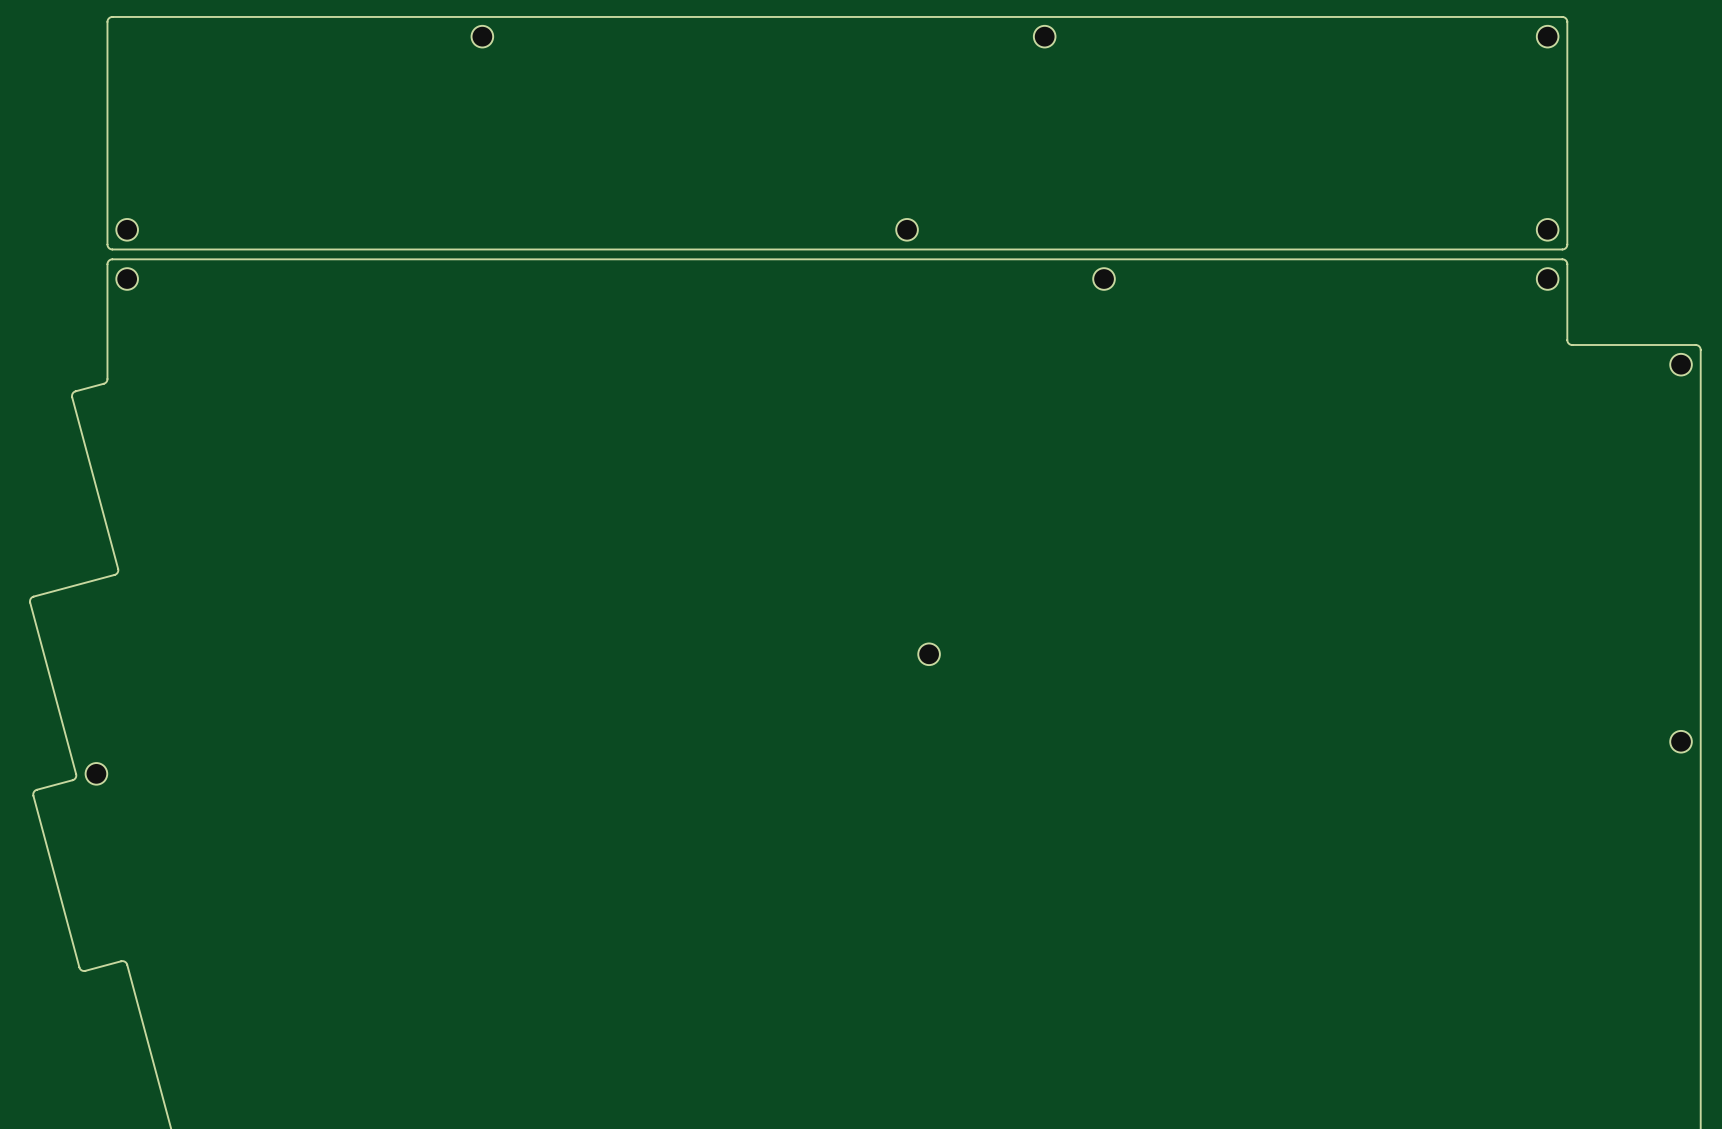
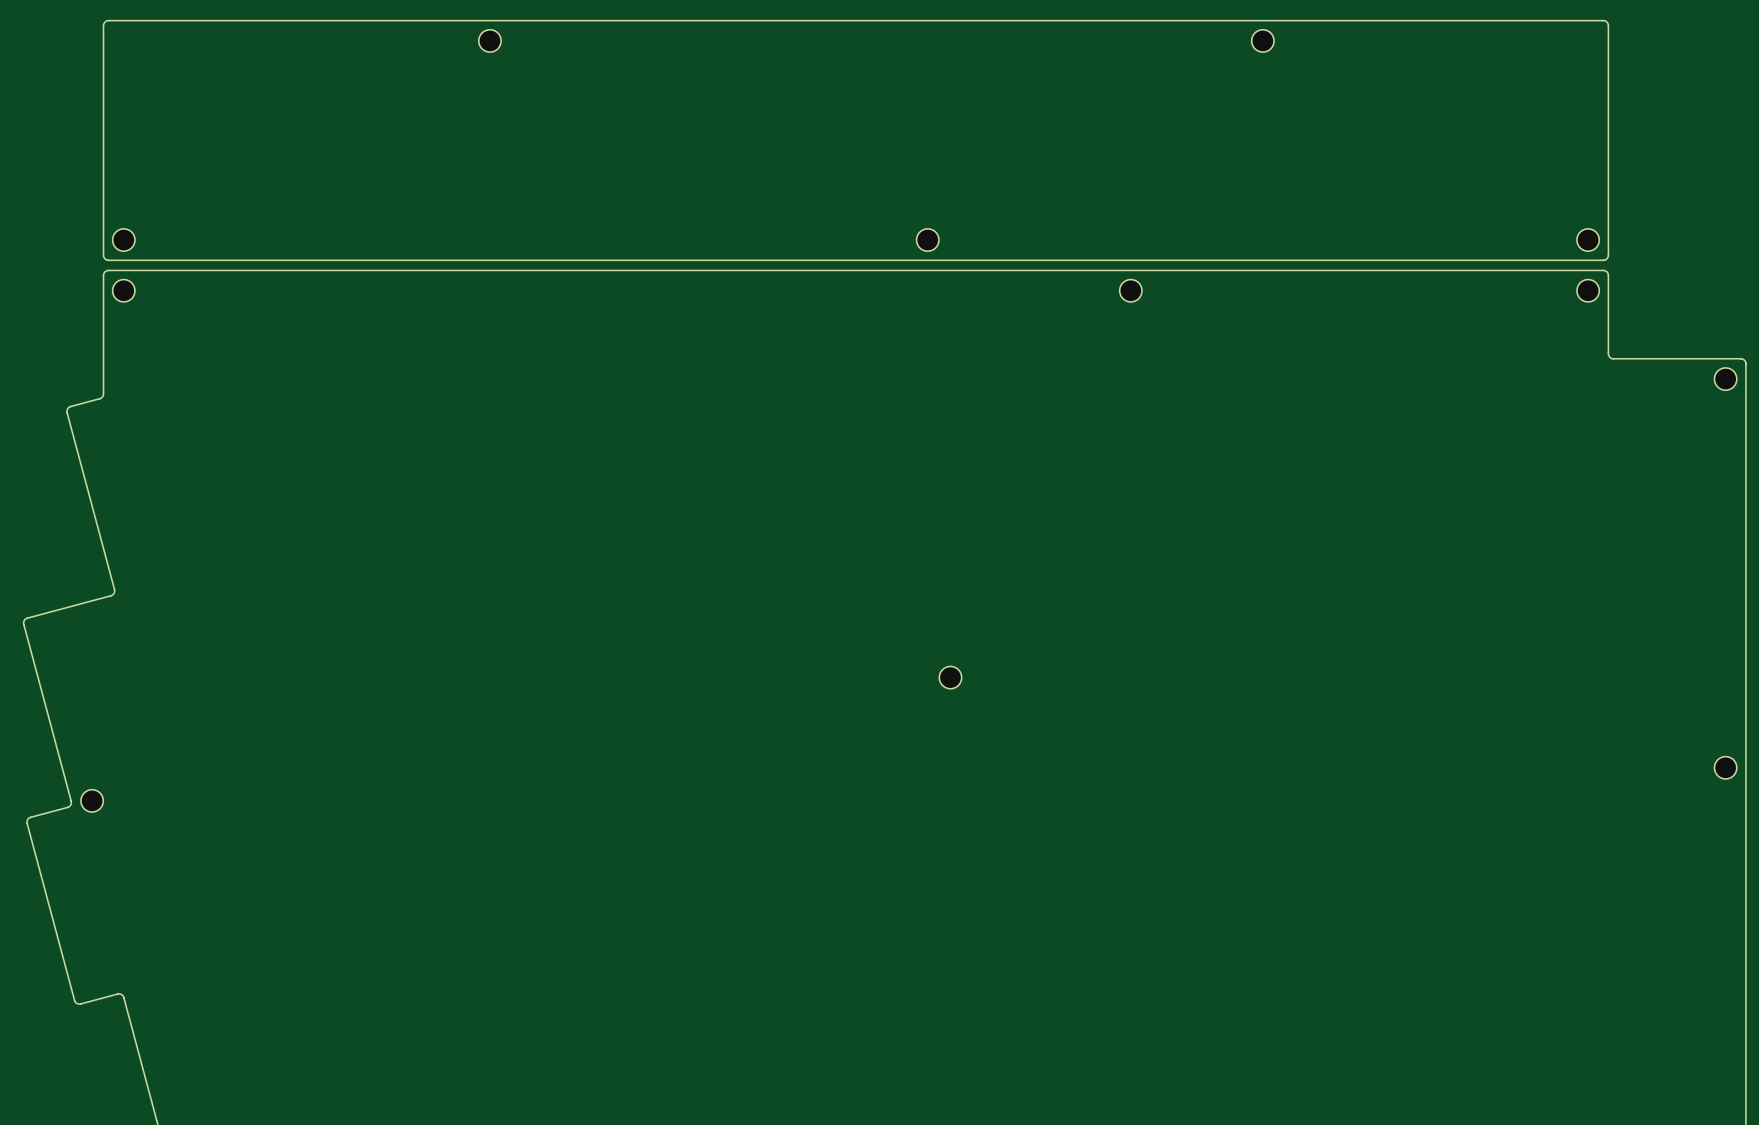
part: (1044, 36) -> none
part: none -> (1262, 40)
part: (1547, 36) -> none

